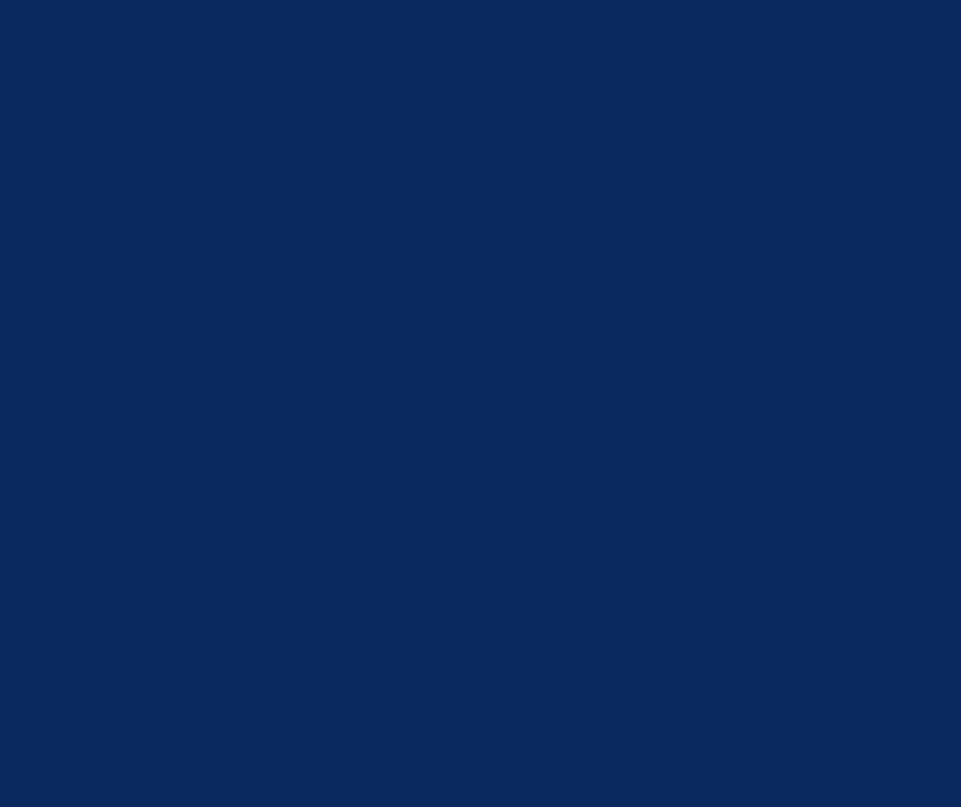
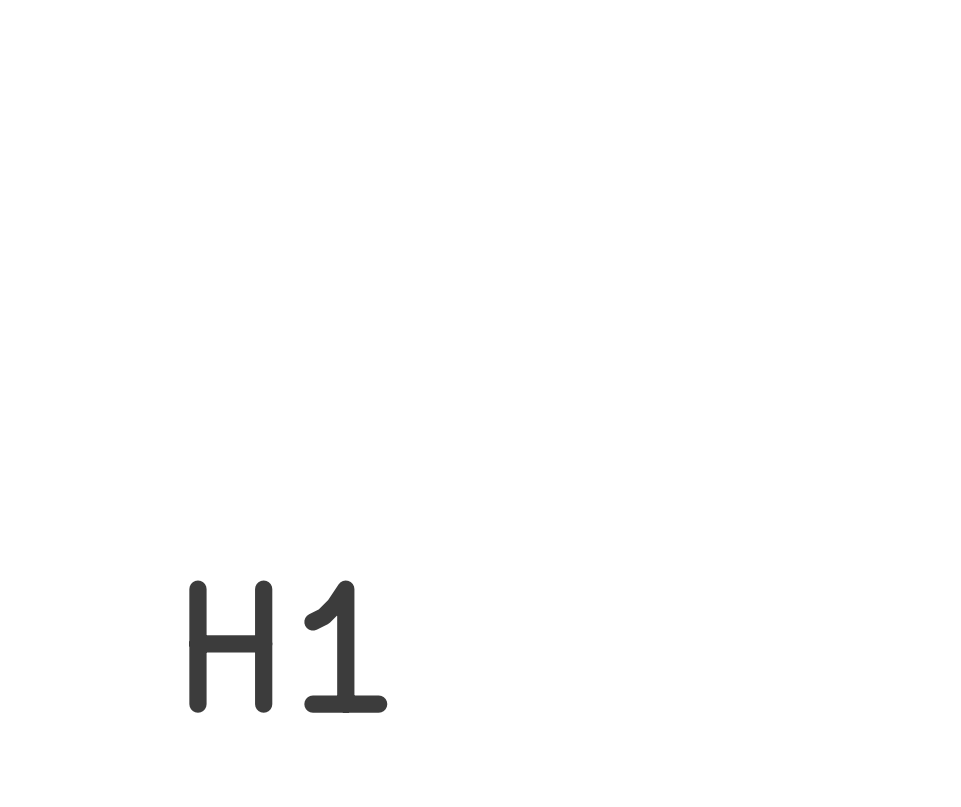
H1: none -> (288, 646)

